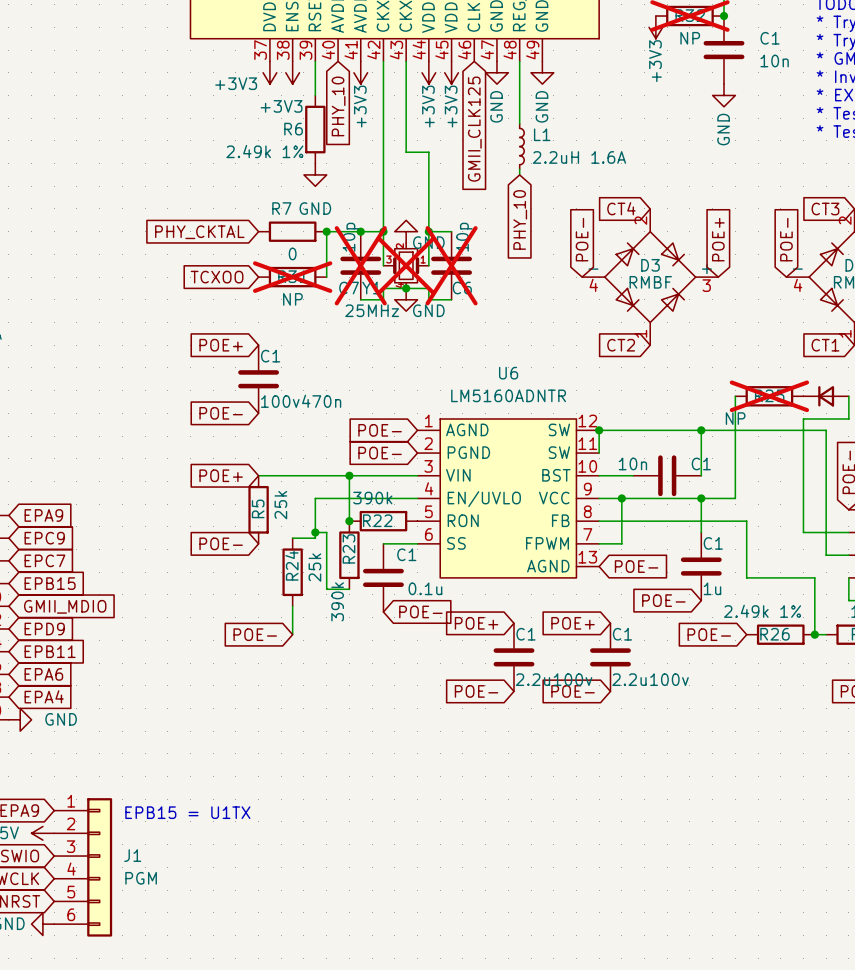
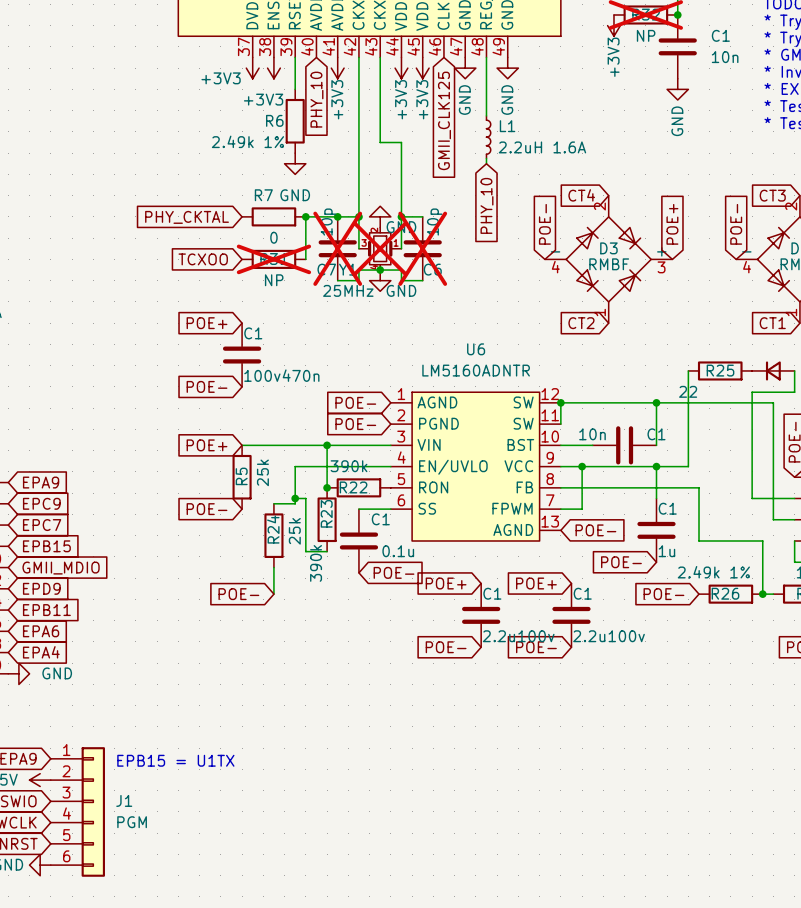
R25 do-not-place cross: (769, 396) -> none
R25 value: NP (735, 418) -> 22 (688, 391)

